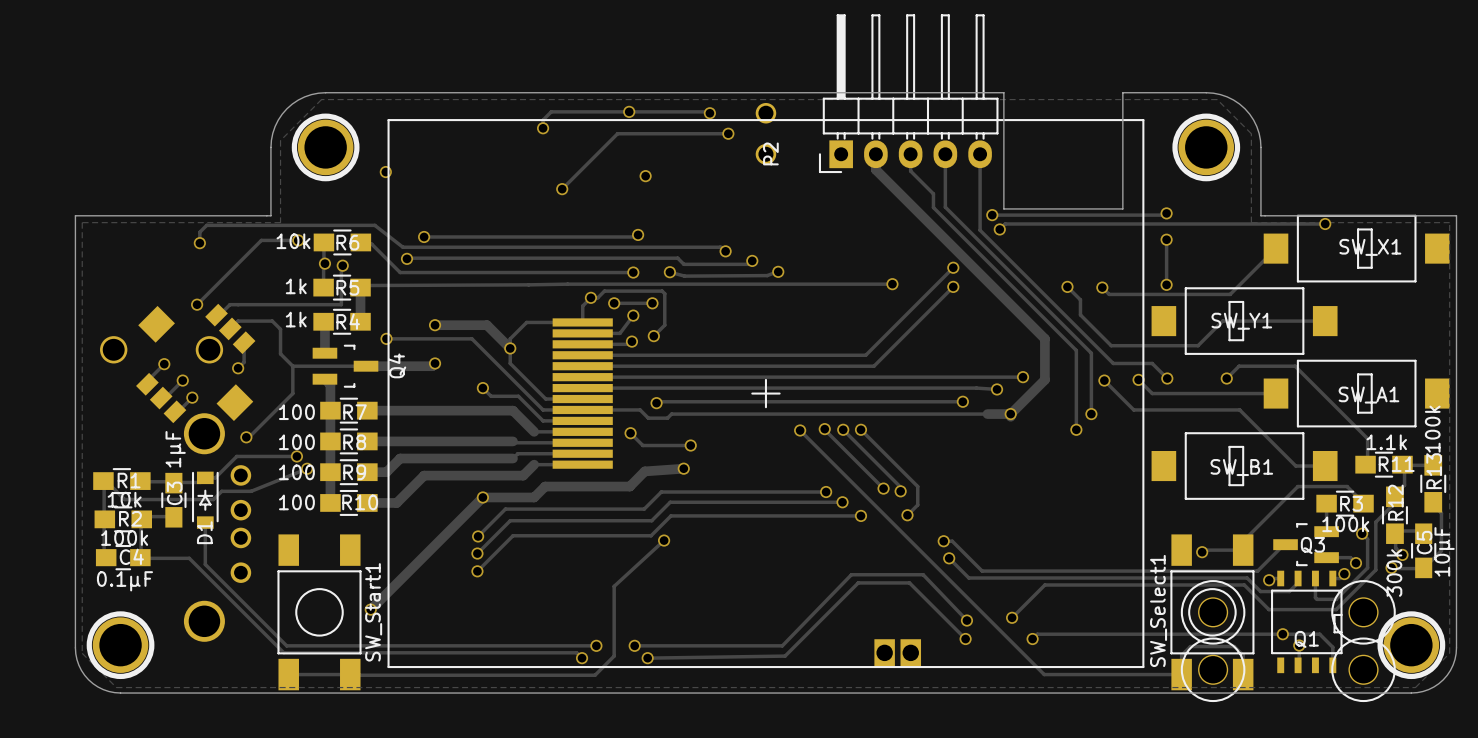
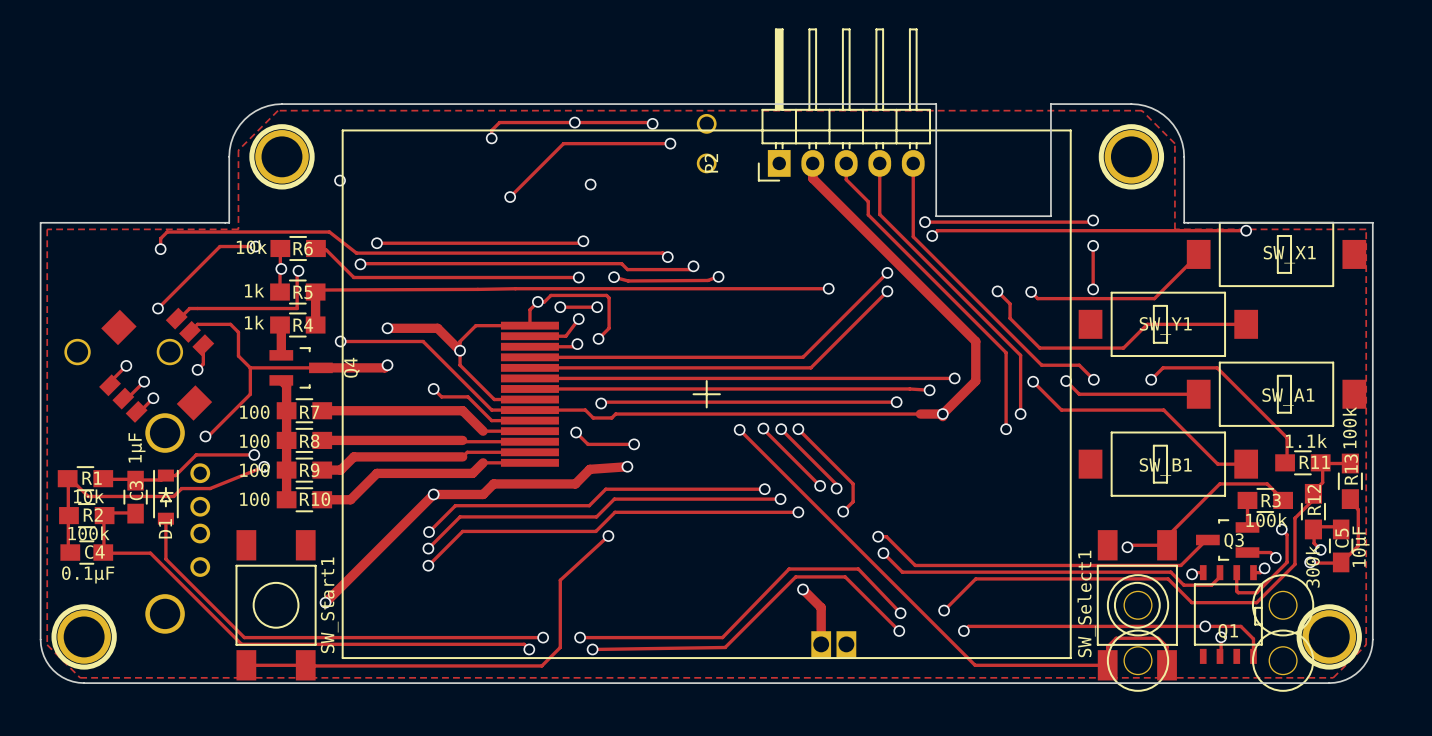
track: none -> (802, 589) (821, 607) (821, 644)
via: none -> (802, 589)

